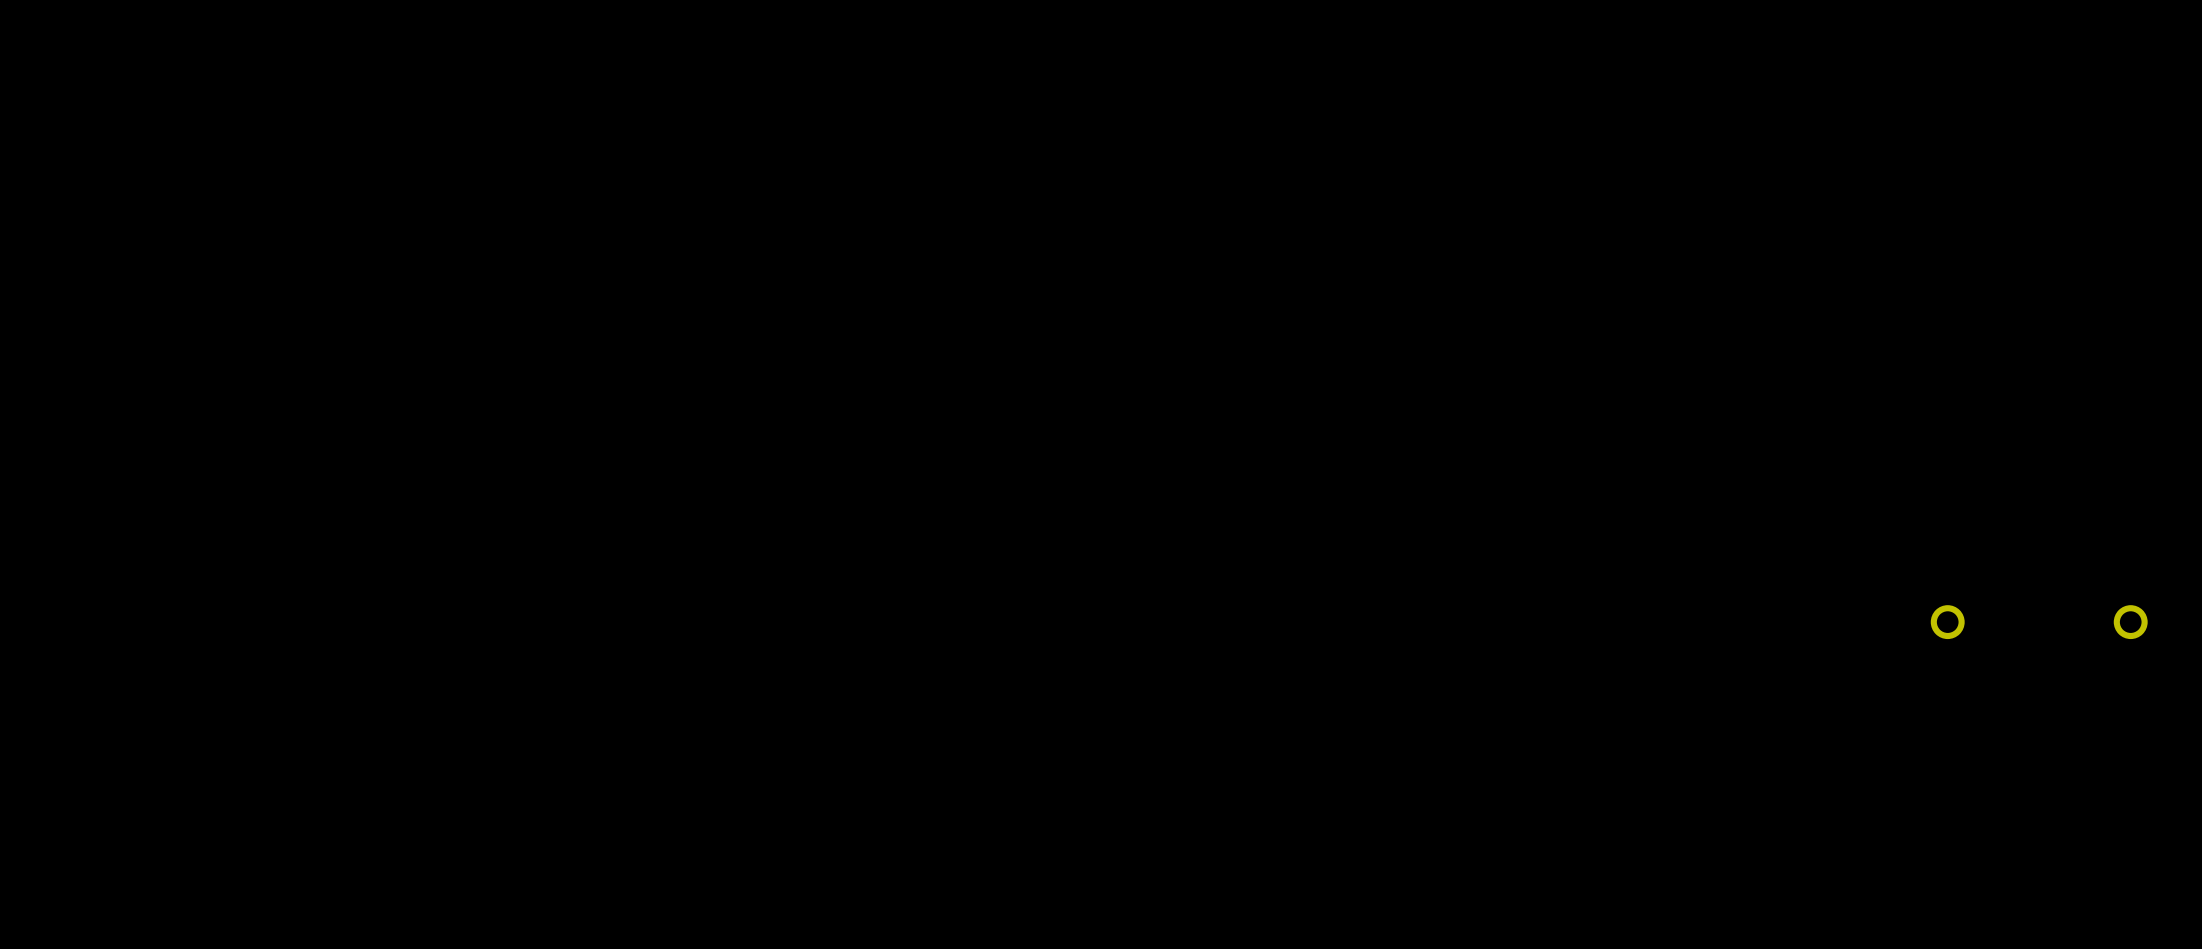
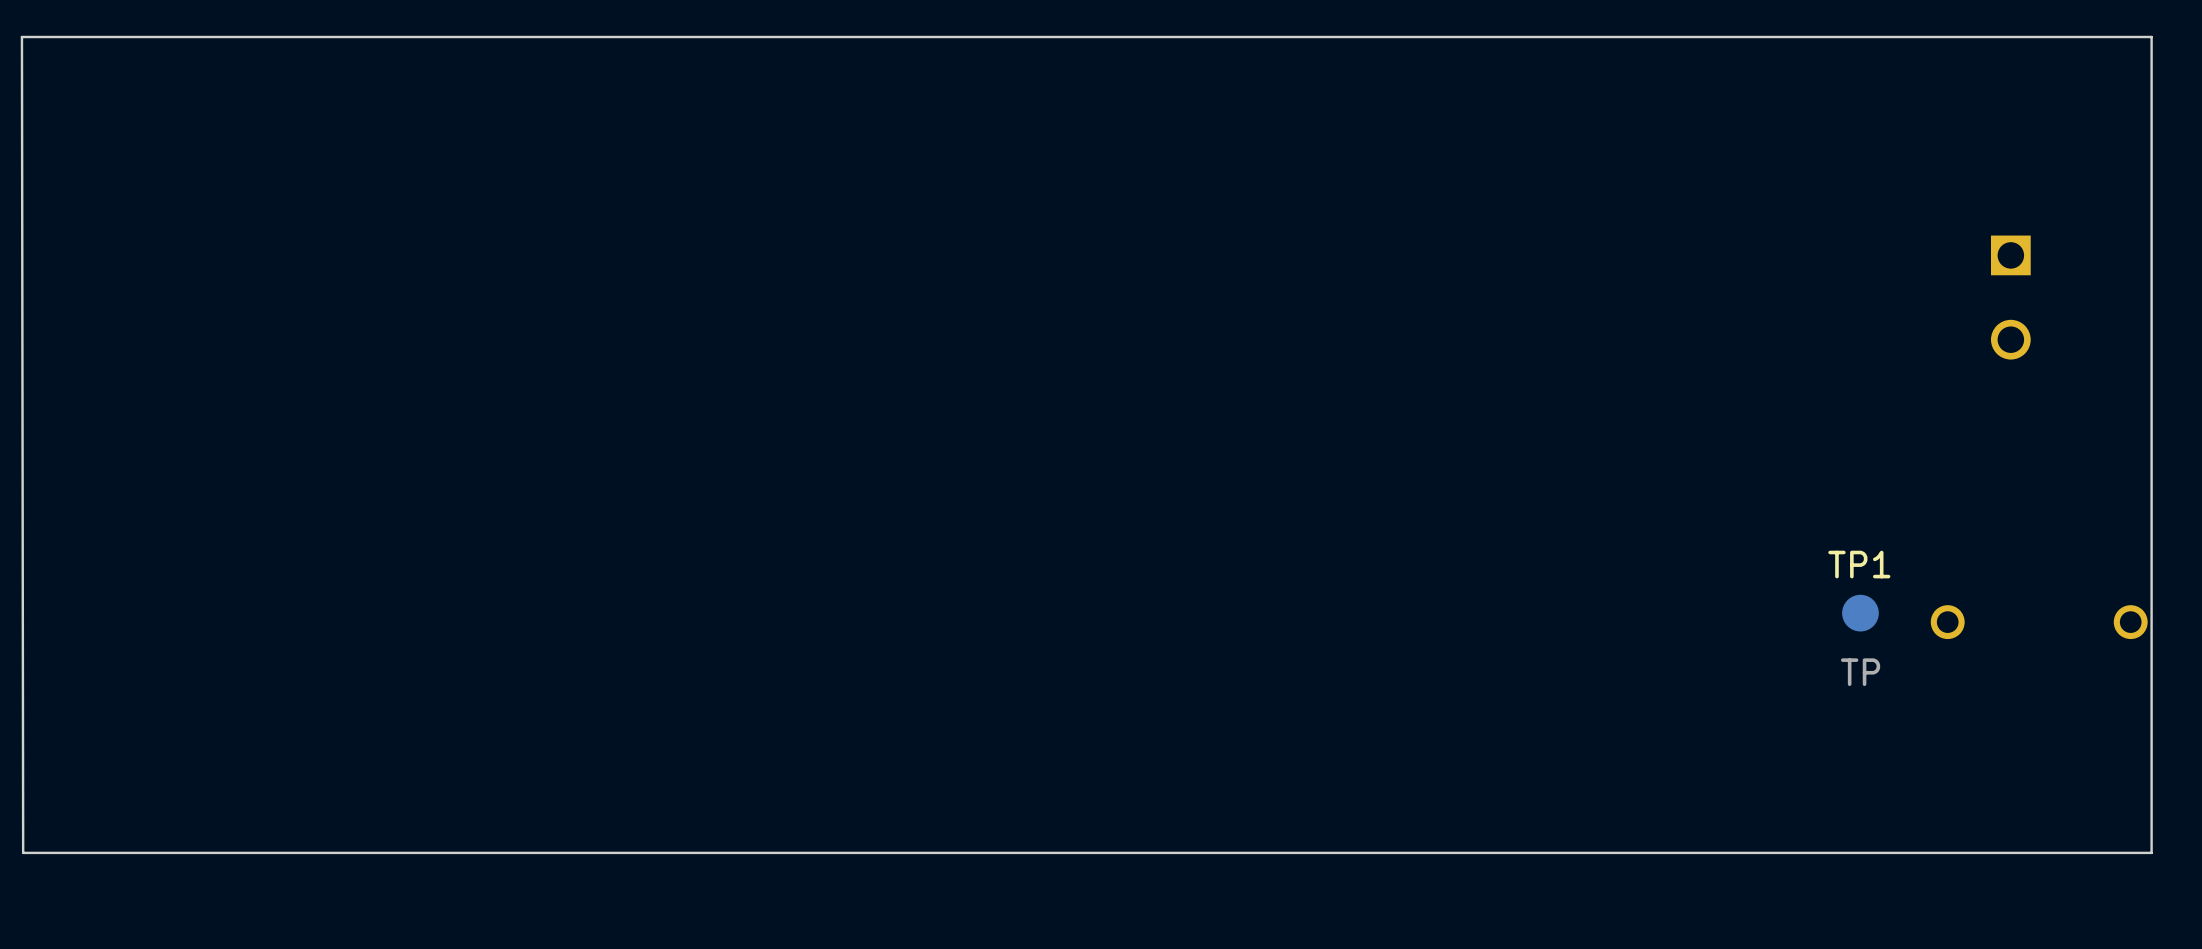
board edge: none -> (2151, 37) (21, 37) (23, 852) (2151, 852) (2151, 37)
part: none -> (2010, 297)
TP1: none -> TP (1860, 613)

